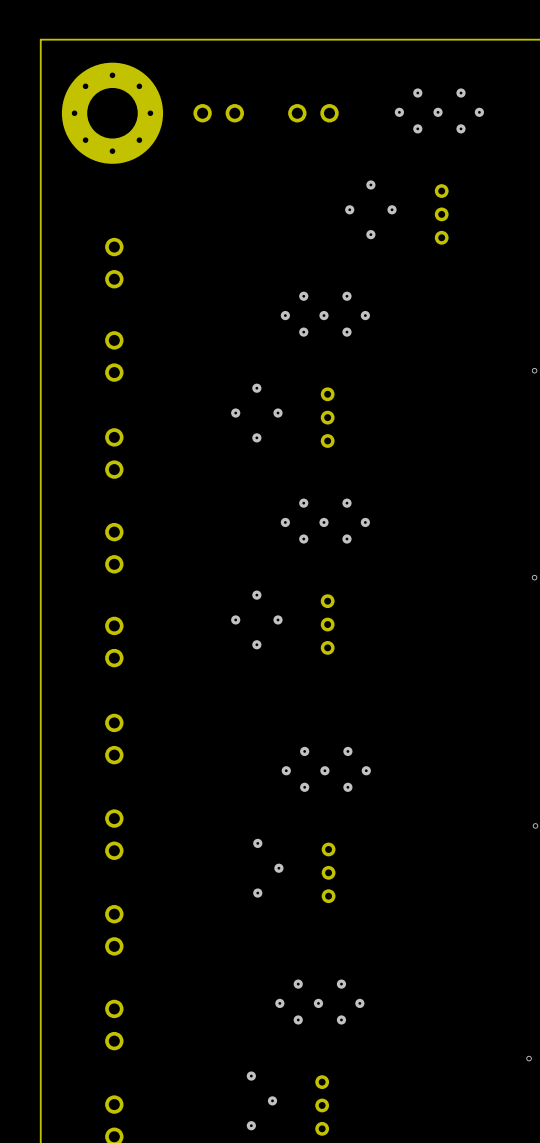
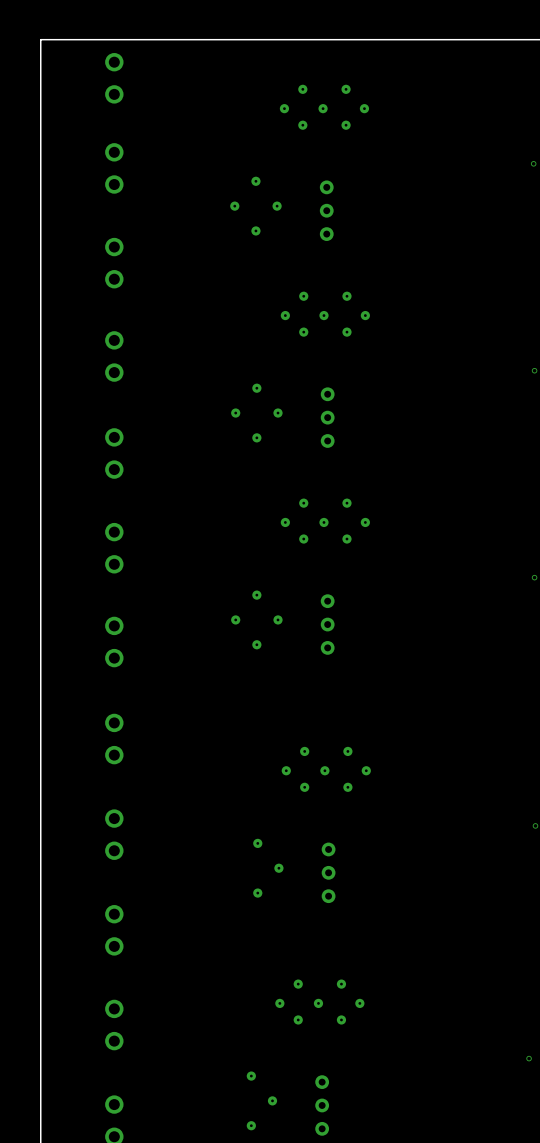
part: none -> (114, 78)
via: none -> (302, 89)
via: none -> (346, 89)
via: (417, 93) -> none
via: (461, 93) -> none
via: none -> (284, 108)
via: none -> (323, 108)
via: none -> (364, 108)
via: (399, 112) -> none
via: (438, 112) -> none
via: (479, 112) -> none
part: (112, 113) -> none
part: (218, 113) -> none
part: (313, 113) -> none
via: none -> (302, 125)
via: none -> (346, 125)
via: (417, 128) -> none
via: (461, 128) -> none
via: none -> (533, 163)
part: none -> (114, 168)
via: none -> (255, 181)
via: (370, 184) -> none
via: none -> (234, 206)
via: none -> (277, 206)
via: (349, 209) -> none
via: (392, 209) -> none
part position: (441, 214) -> (326, 210)
via: none -> (255, 230)
via: (370, 234) -> none

